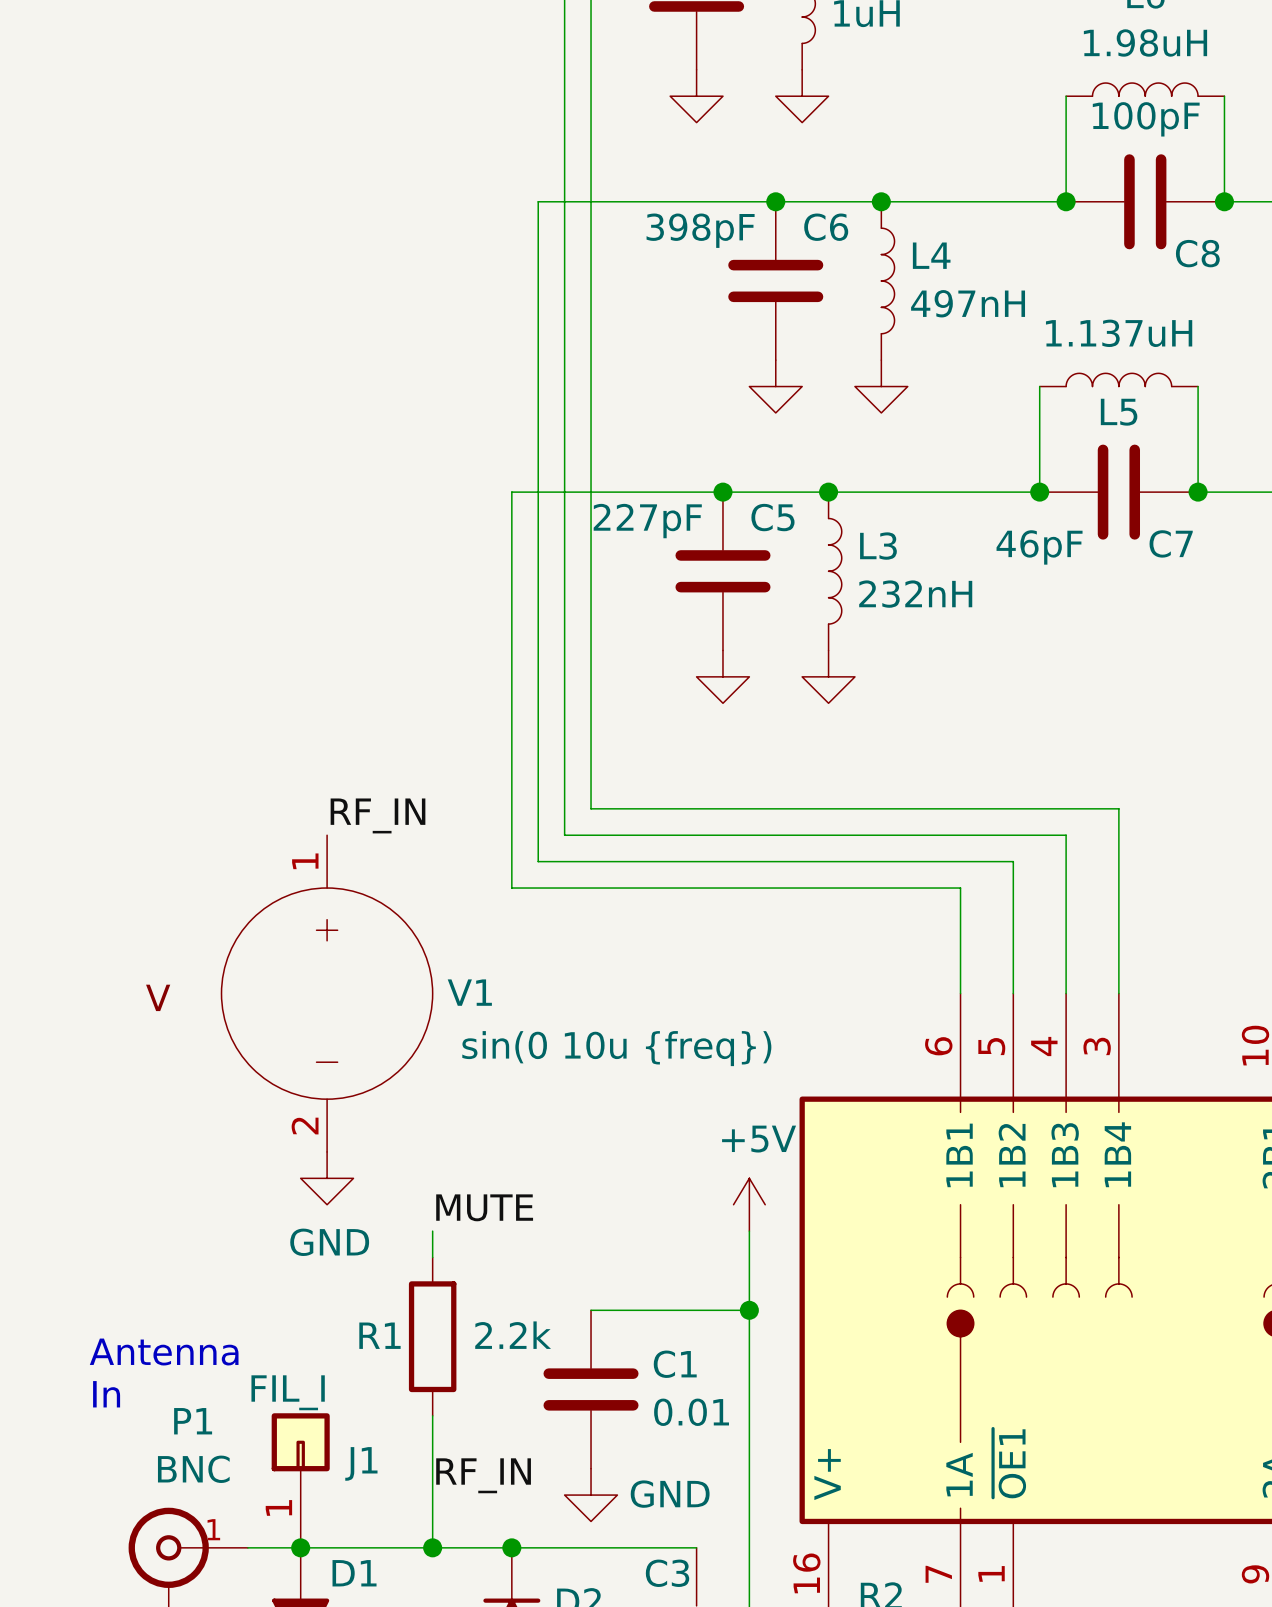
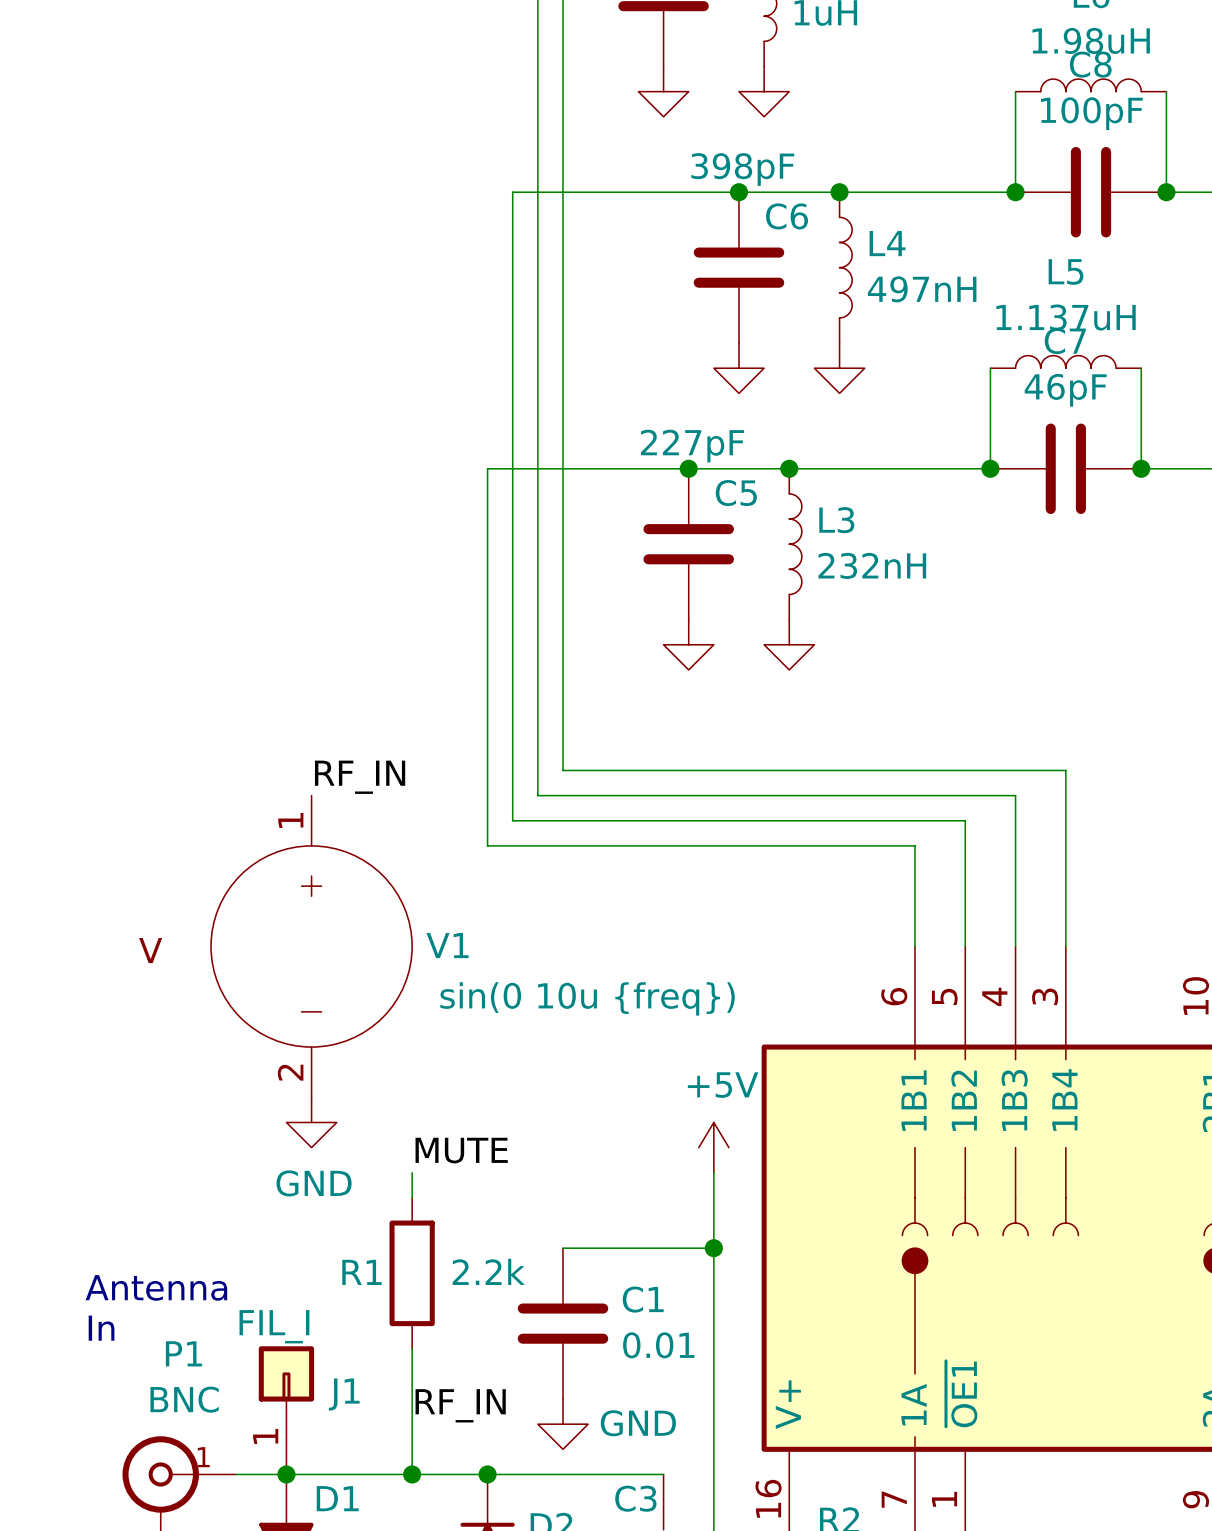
C6 value position: 398pF (700, 230) -> 398pF (742, 169)
C8 name position: C8 (1197, 253) -> C8 (1090, 64)
L5 name position: L5 (1119, 412) -> L5 (1066, 271)
C5 value position: 227pF (647, 521) -> 227pF (692, 446)
C7 name position: C7 (1171, 543) -> C7 (1065, 341)
C7 value position: 46pF (1039, 547) -> 46pF (1065, 390)

